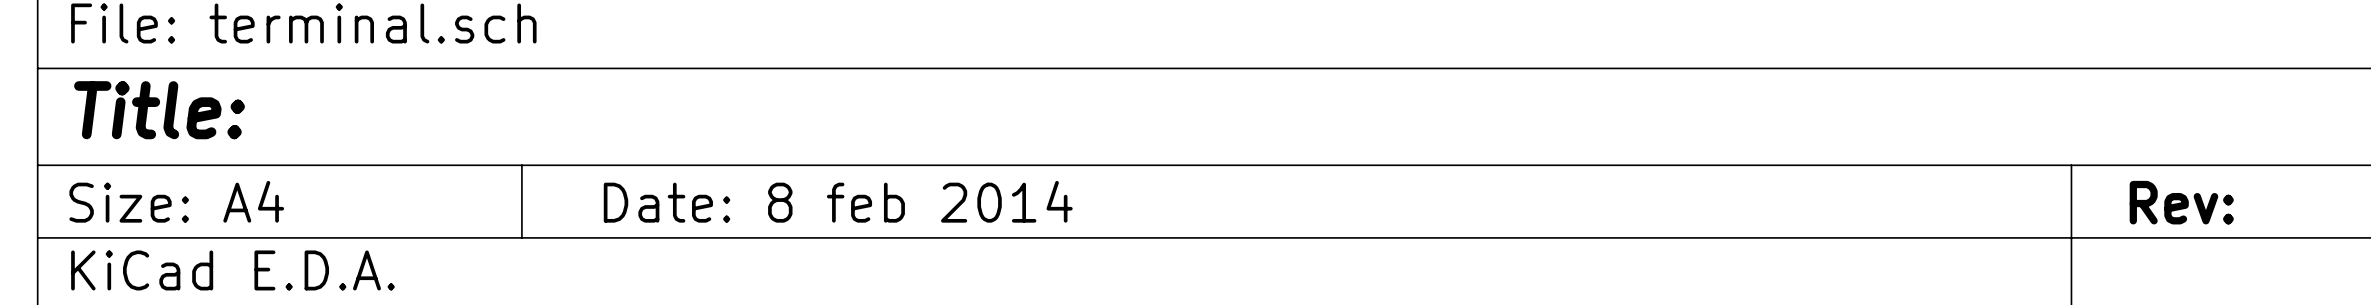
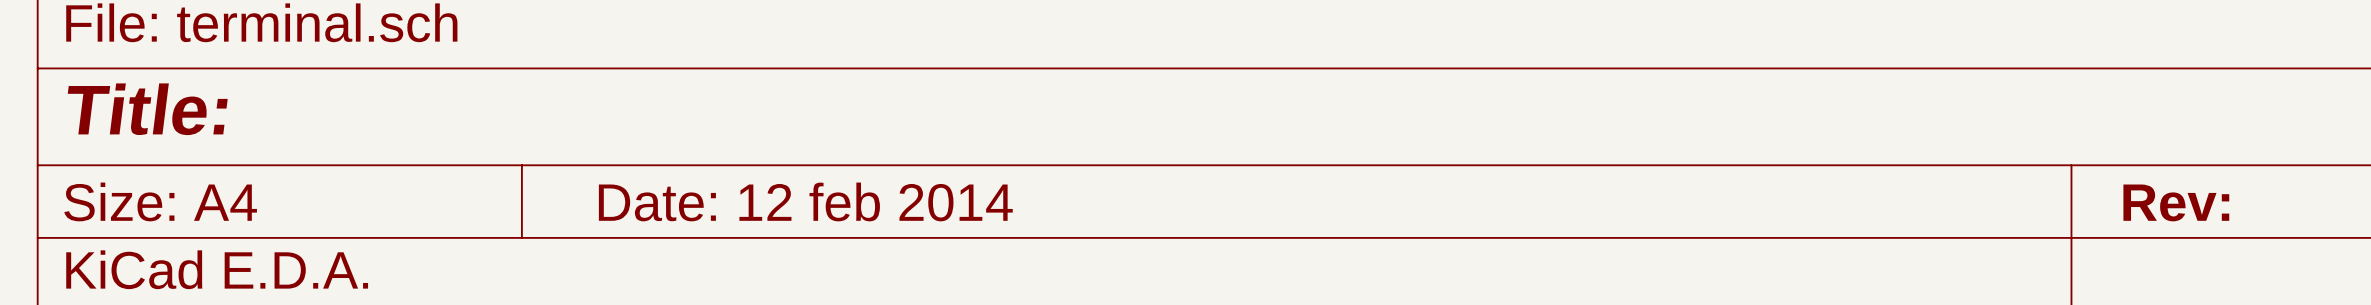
title block: Date: 8 feb 2014 (838, 201) -> Date: 12 feb 2014 (805, 201)

